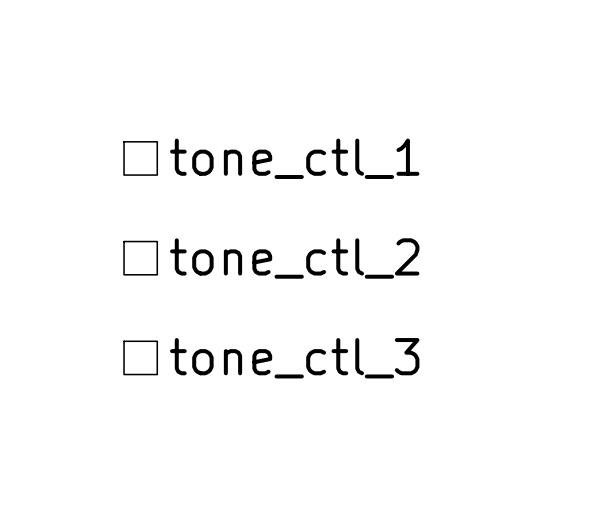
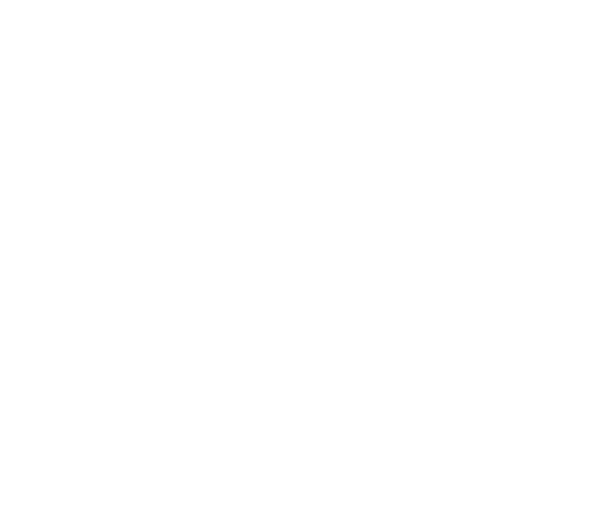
hierarchical label: tone_ctl_1 (294, 158) -> none
hierarchical label: tone_ctl_2 (294, 258) -> none
hierarchical label: tone_ctl_3 (294, 358) -> none

